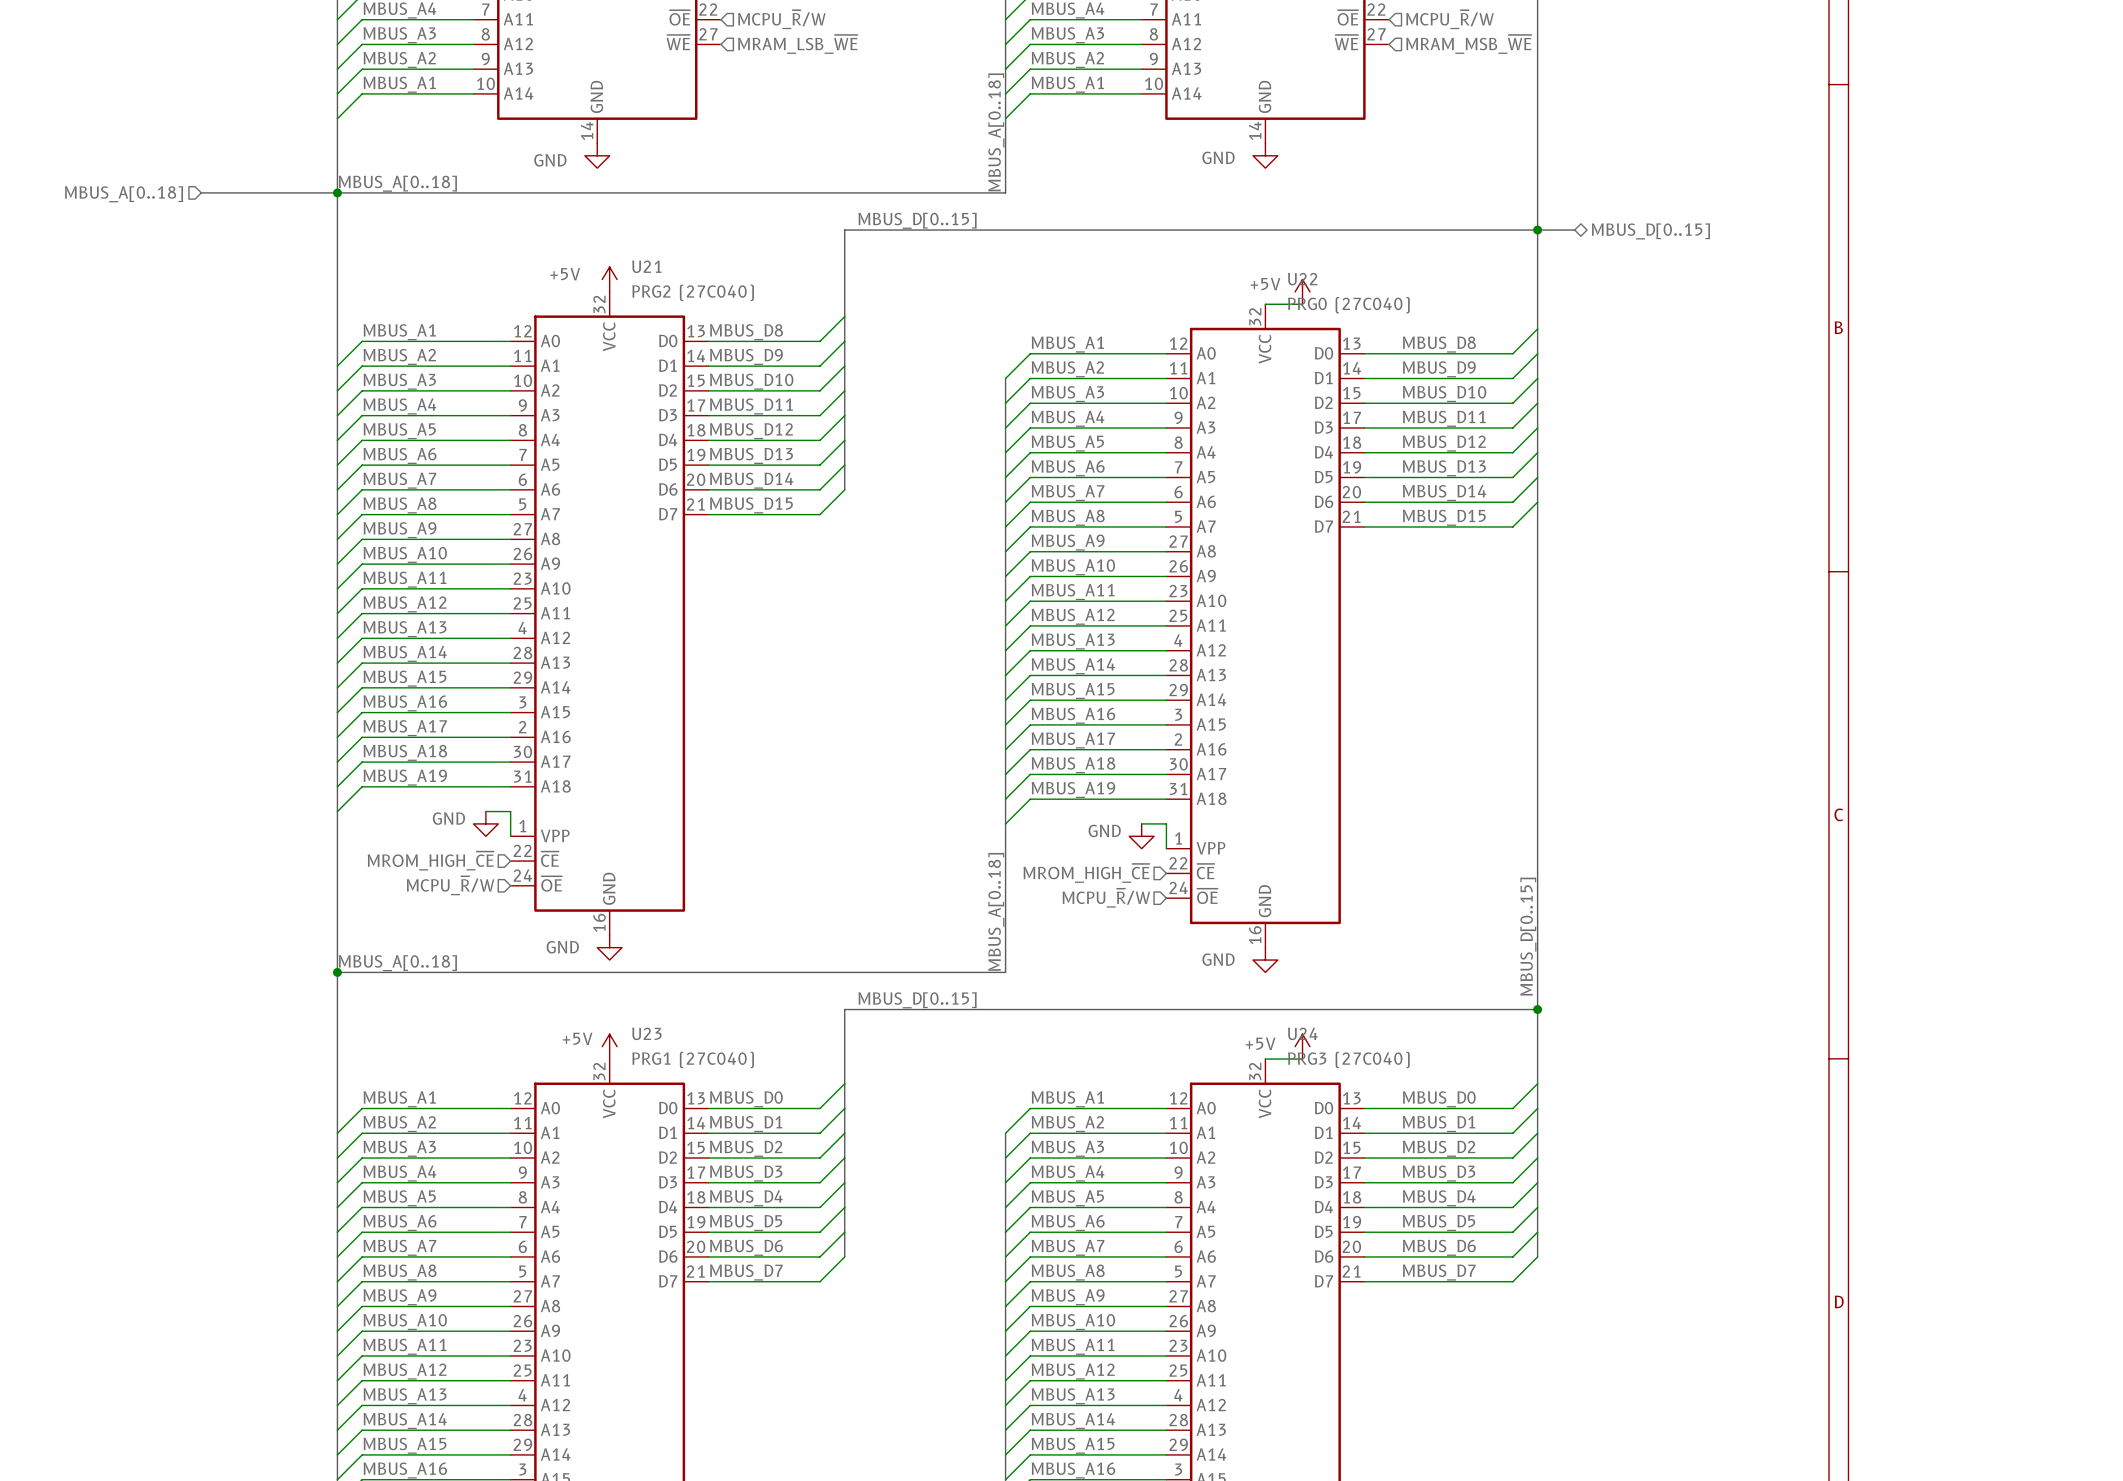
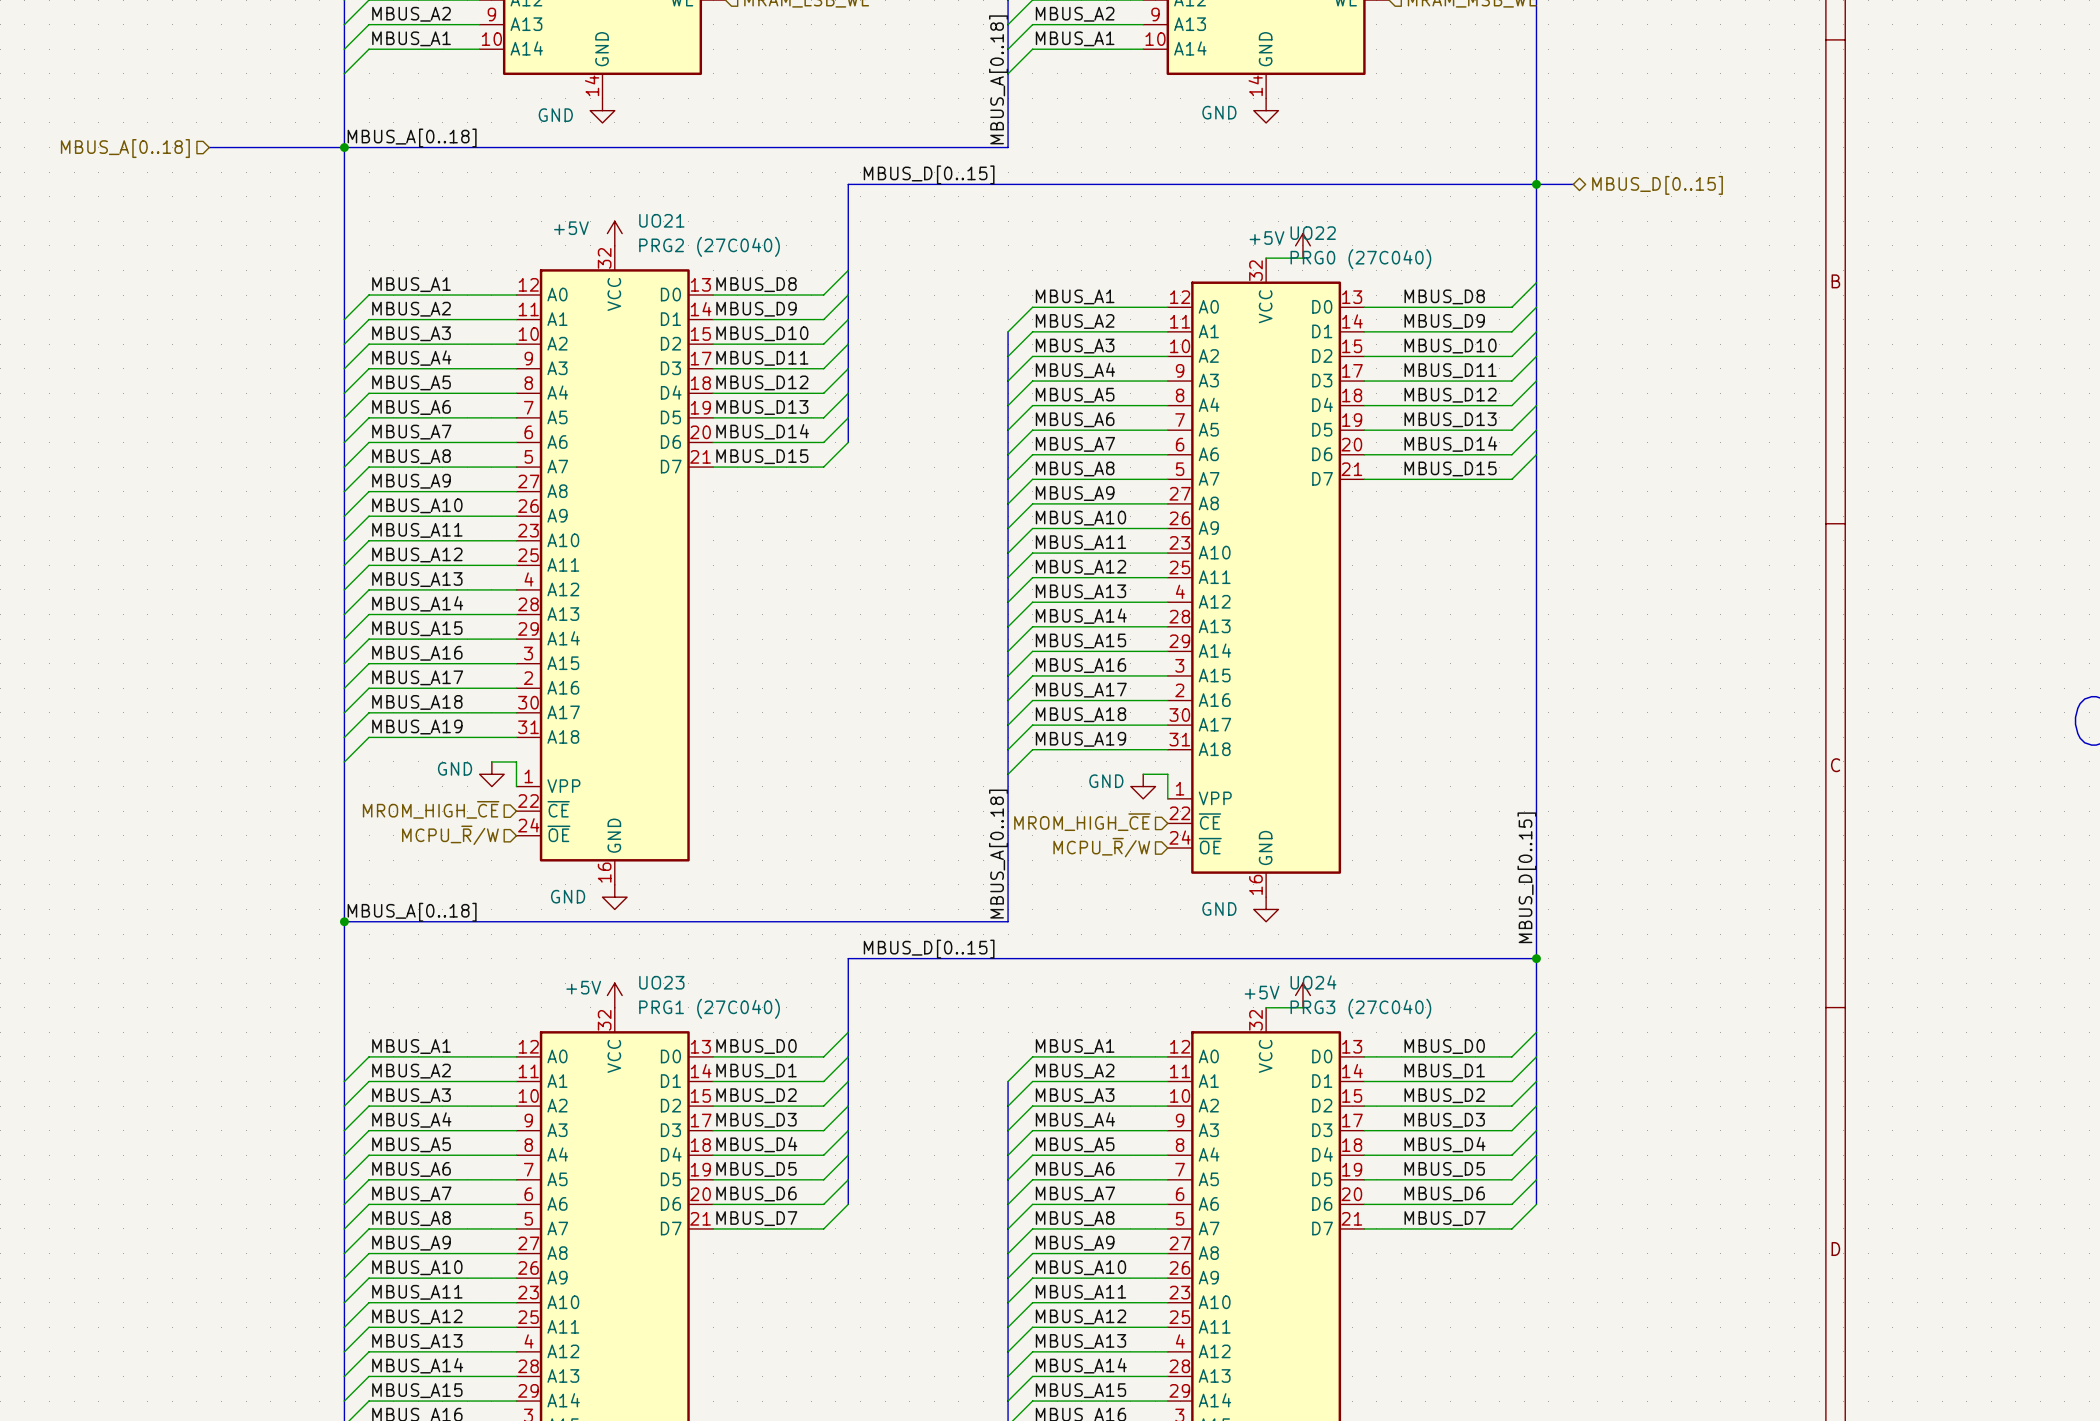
U21 name: U21 (646, 266) -> UO21 (661, 220)
U22 name: U22 (1302, 279) -> UO22 (1313, 233)
U23 name: U23 (646, 1033) -> UO23 (661, 982)
U24 name: U24 (1302, 1033) -> UO24 (1313, 982)

